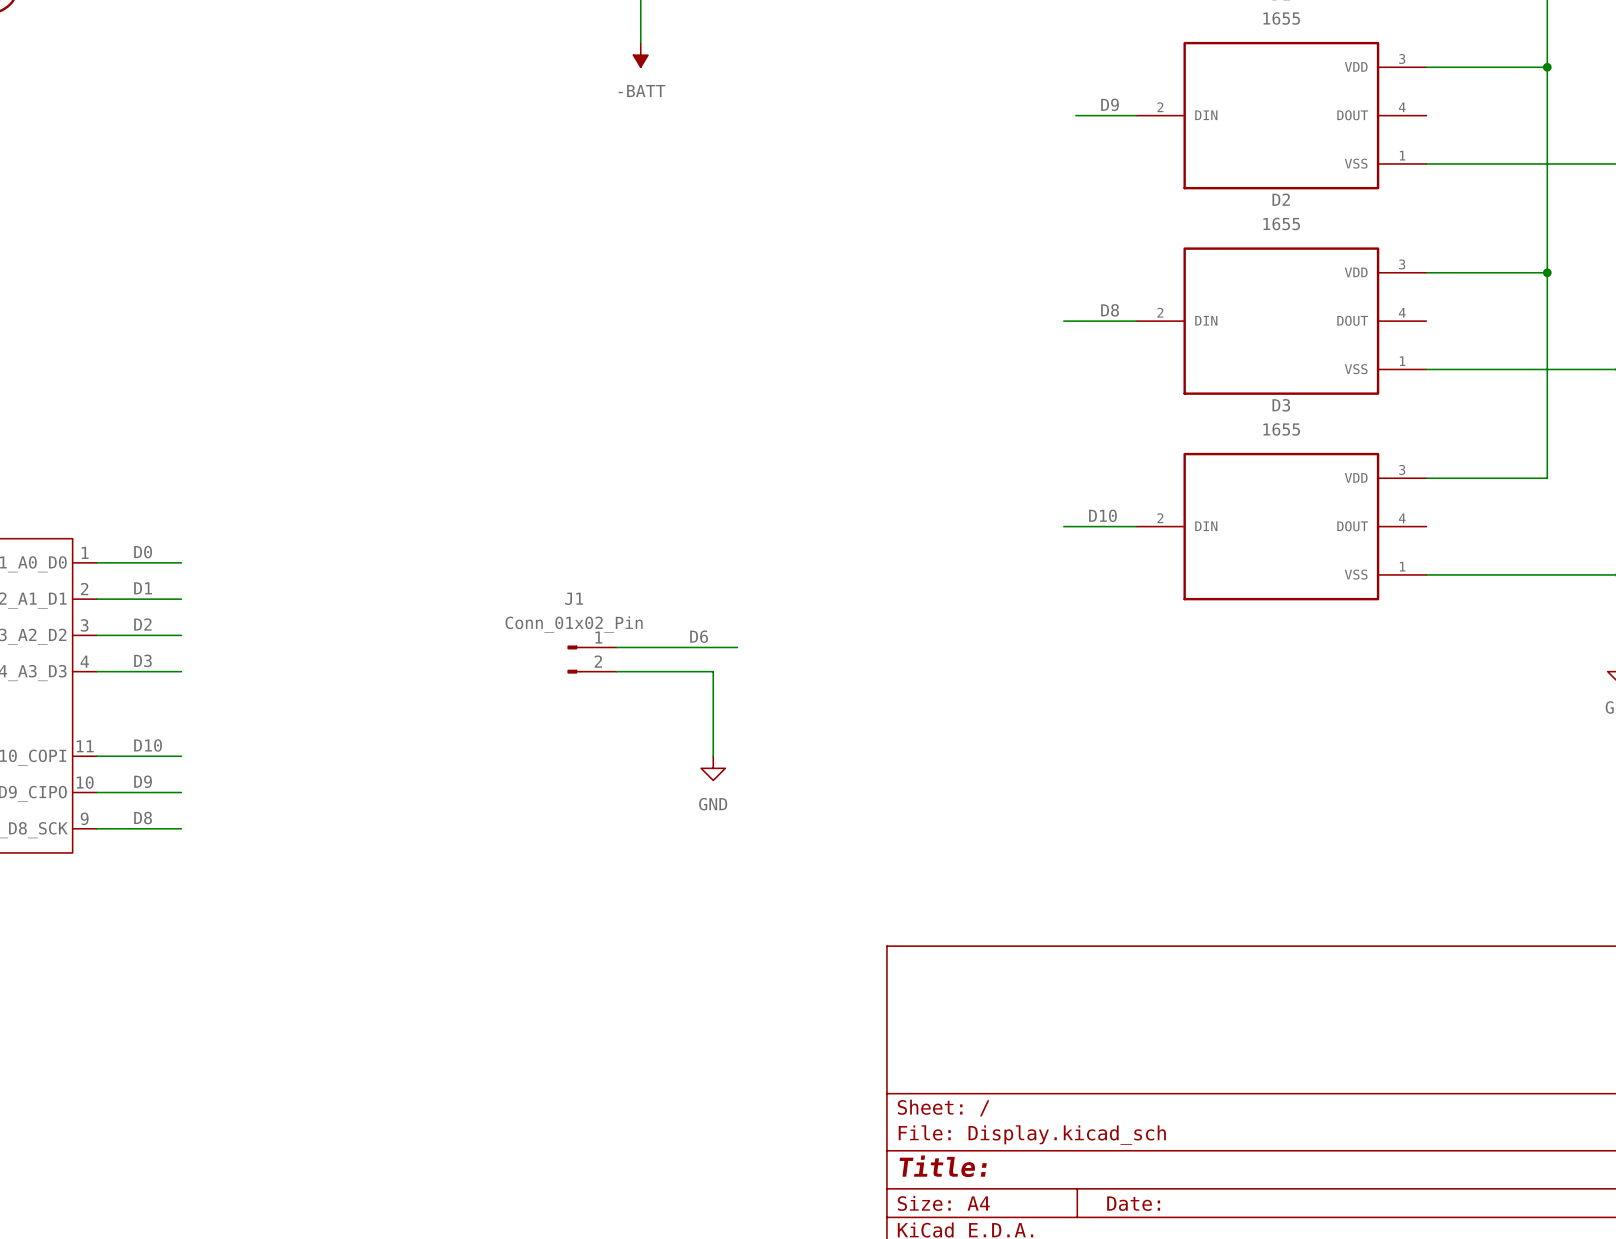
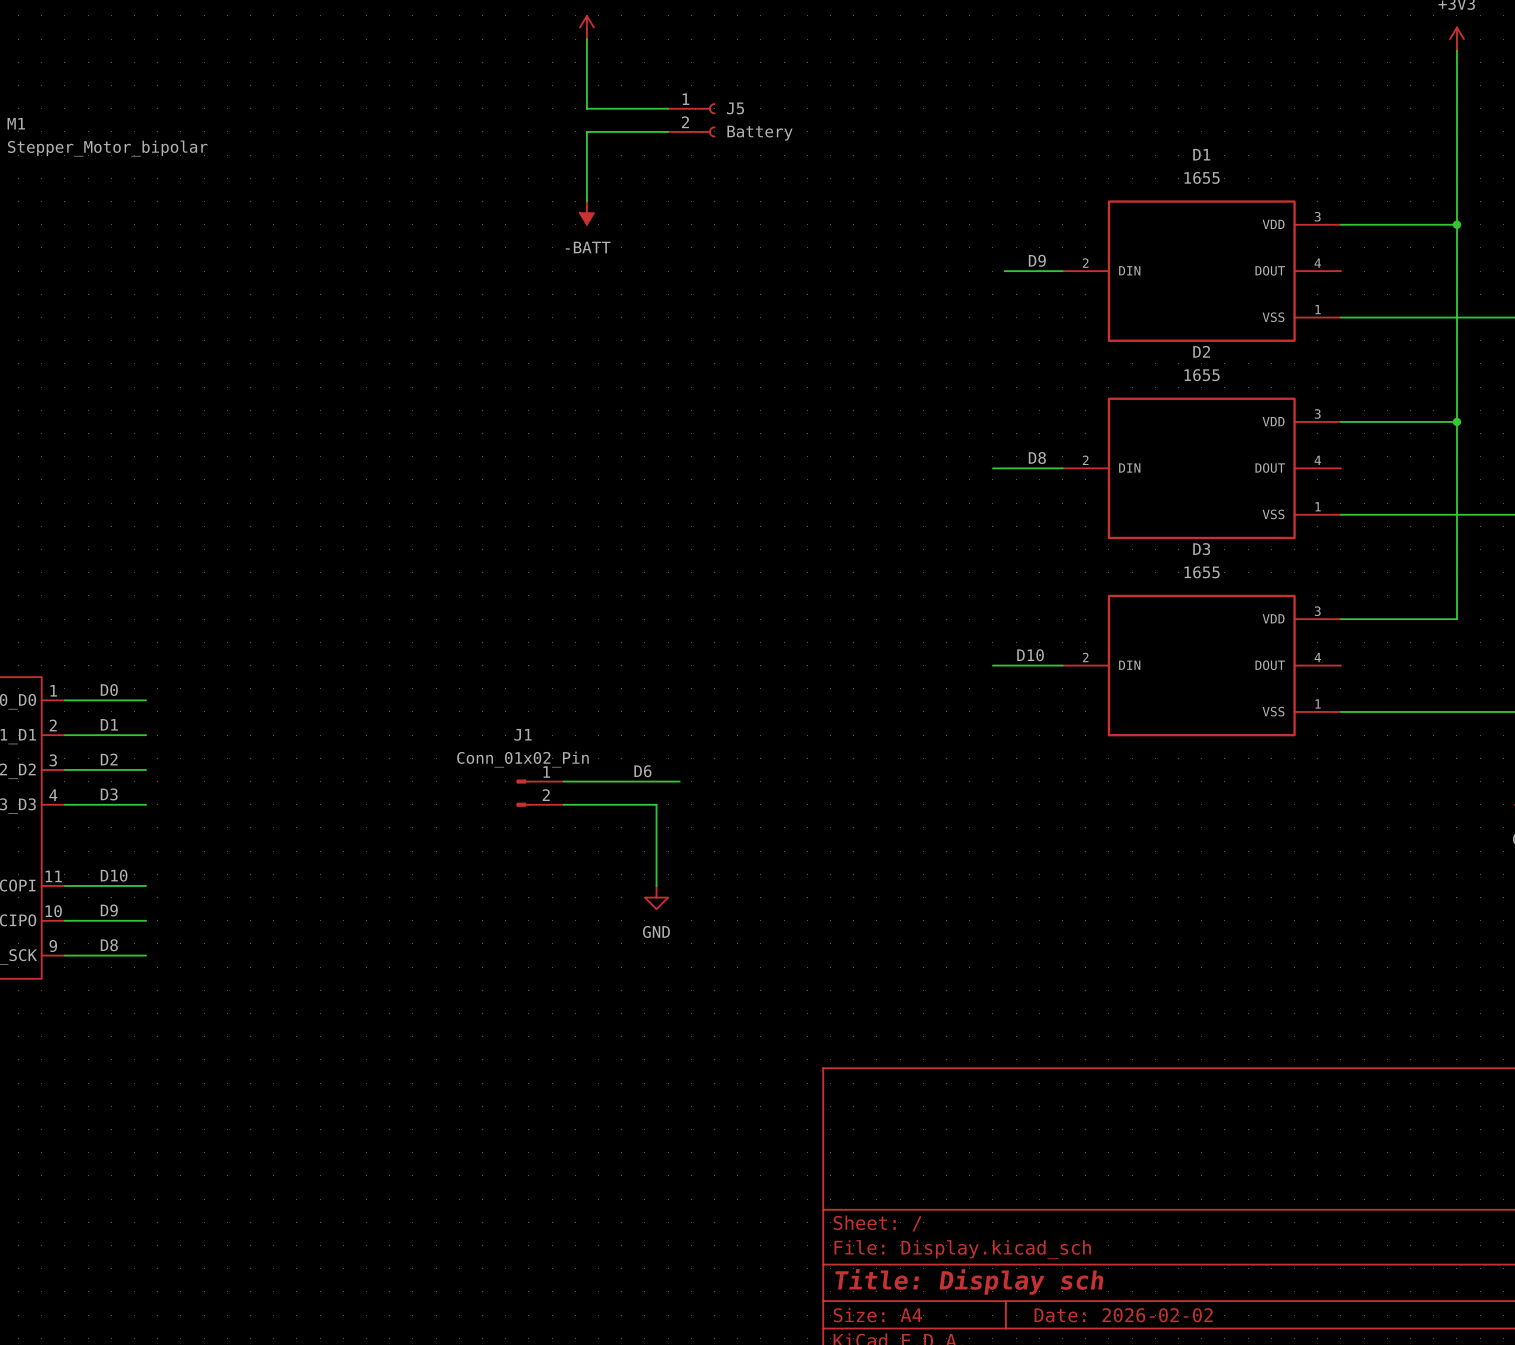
title block: Title: (943, 1166) -> Title: Display sch (969, 1281)
title block: Date: (1133, 1203) -> Date: 2026-02-02 (1123, 1315)

